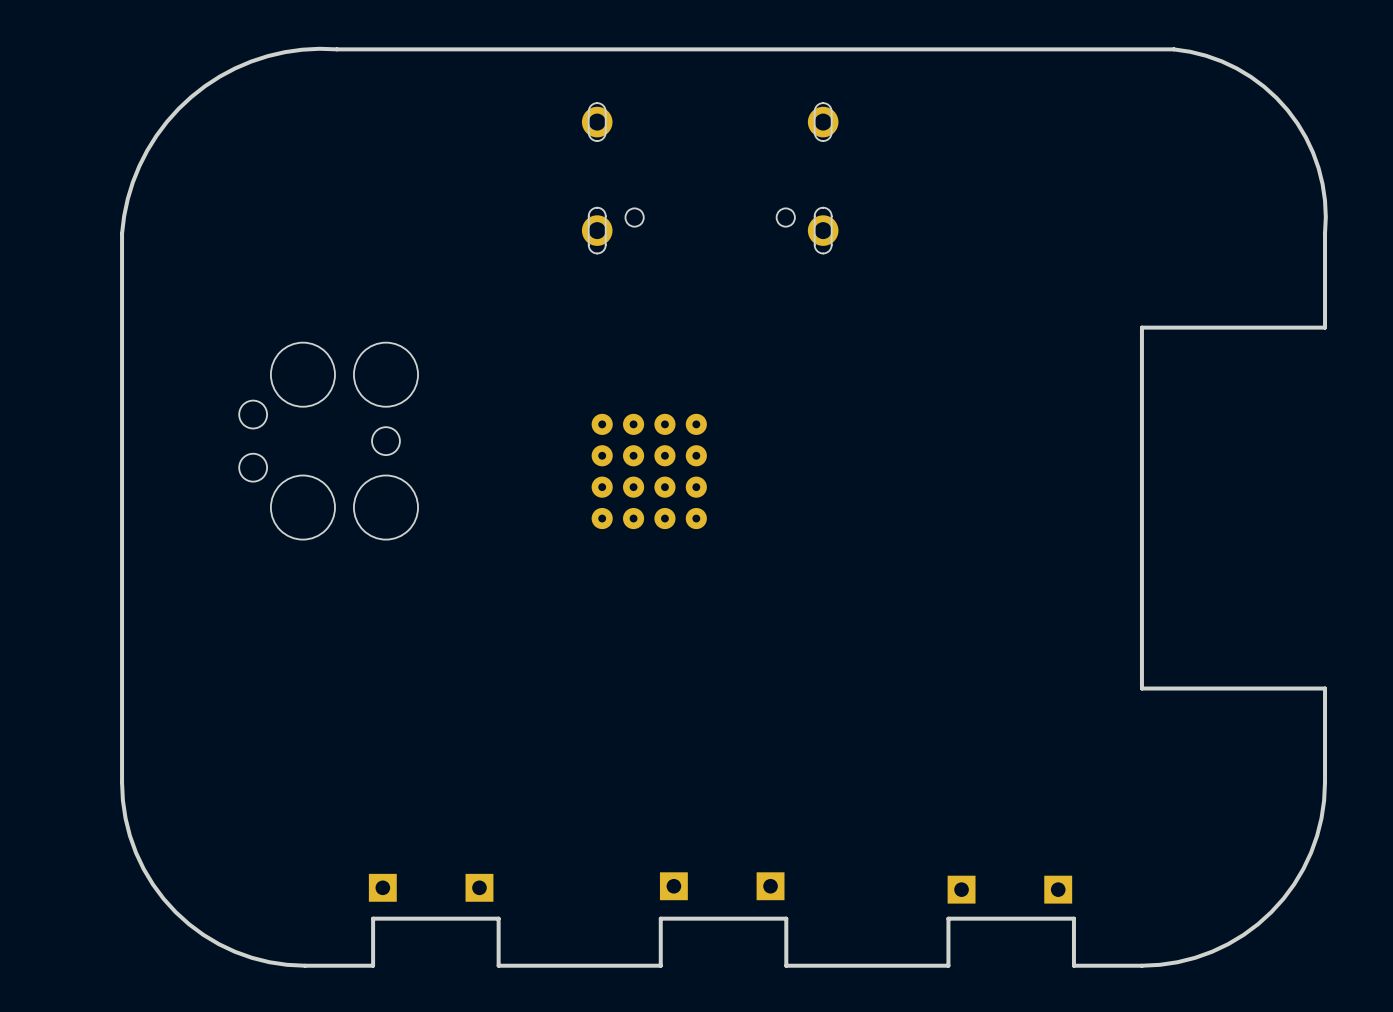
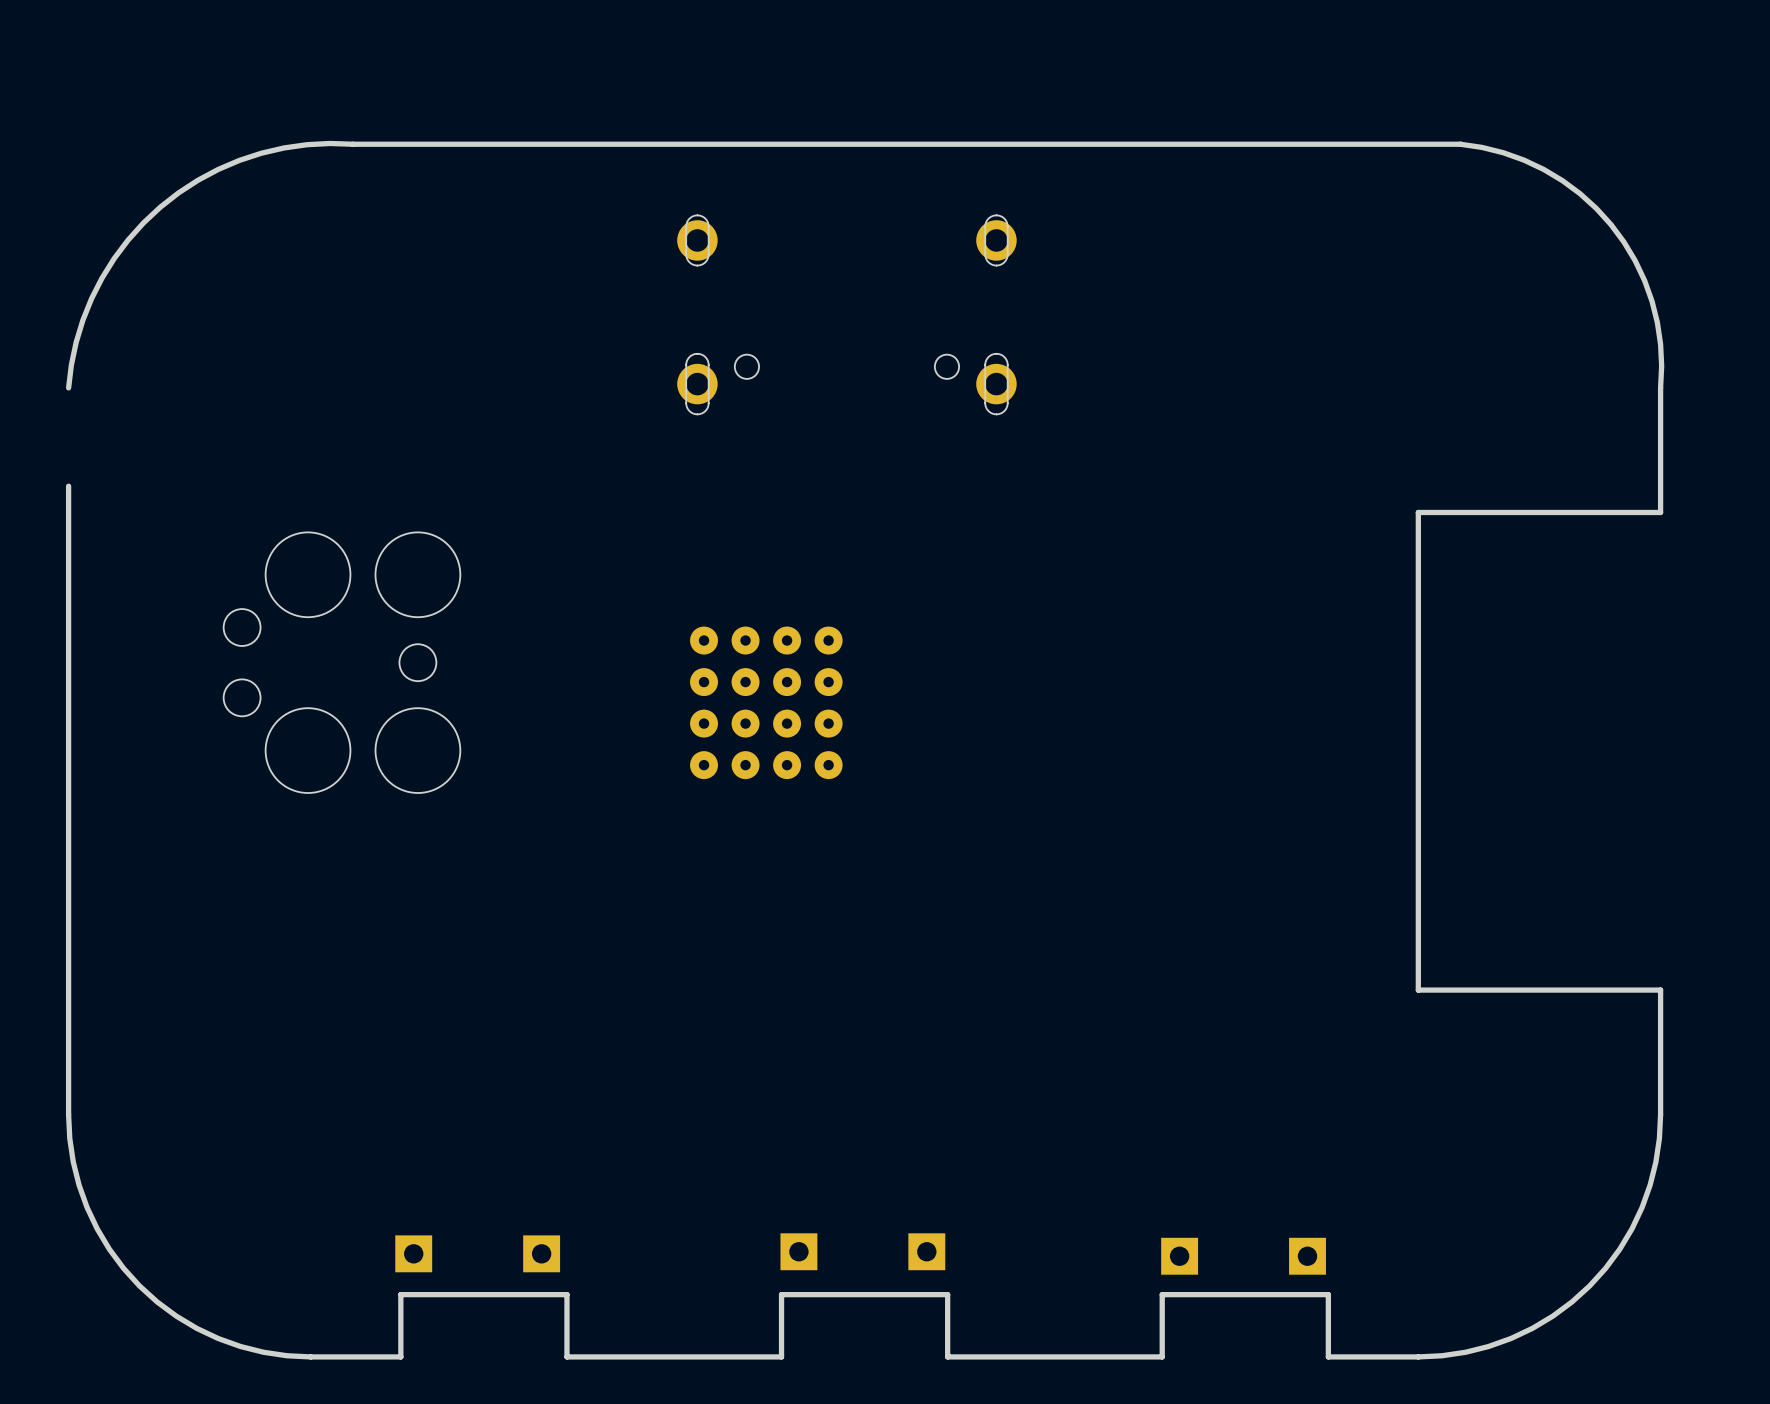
board edge: (122, 233) (122, 307) -> none

